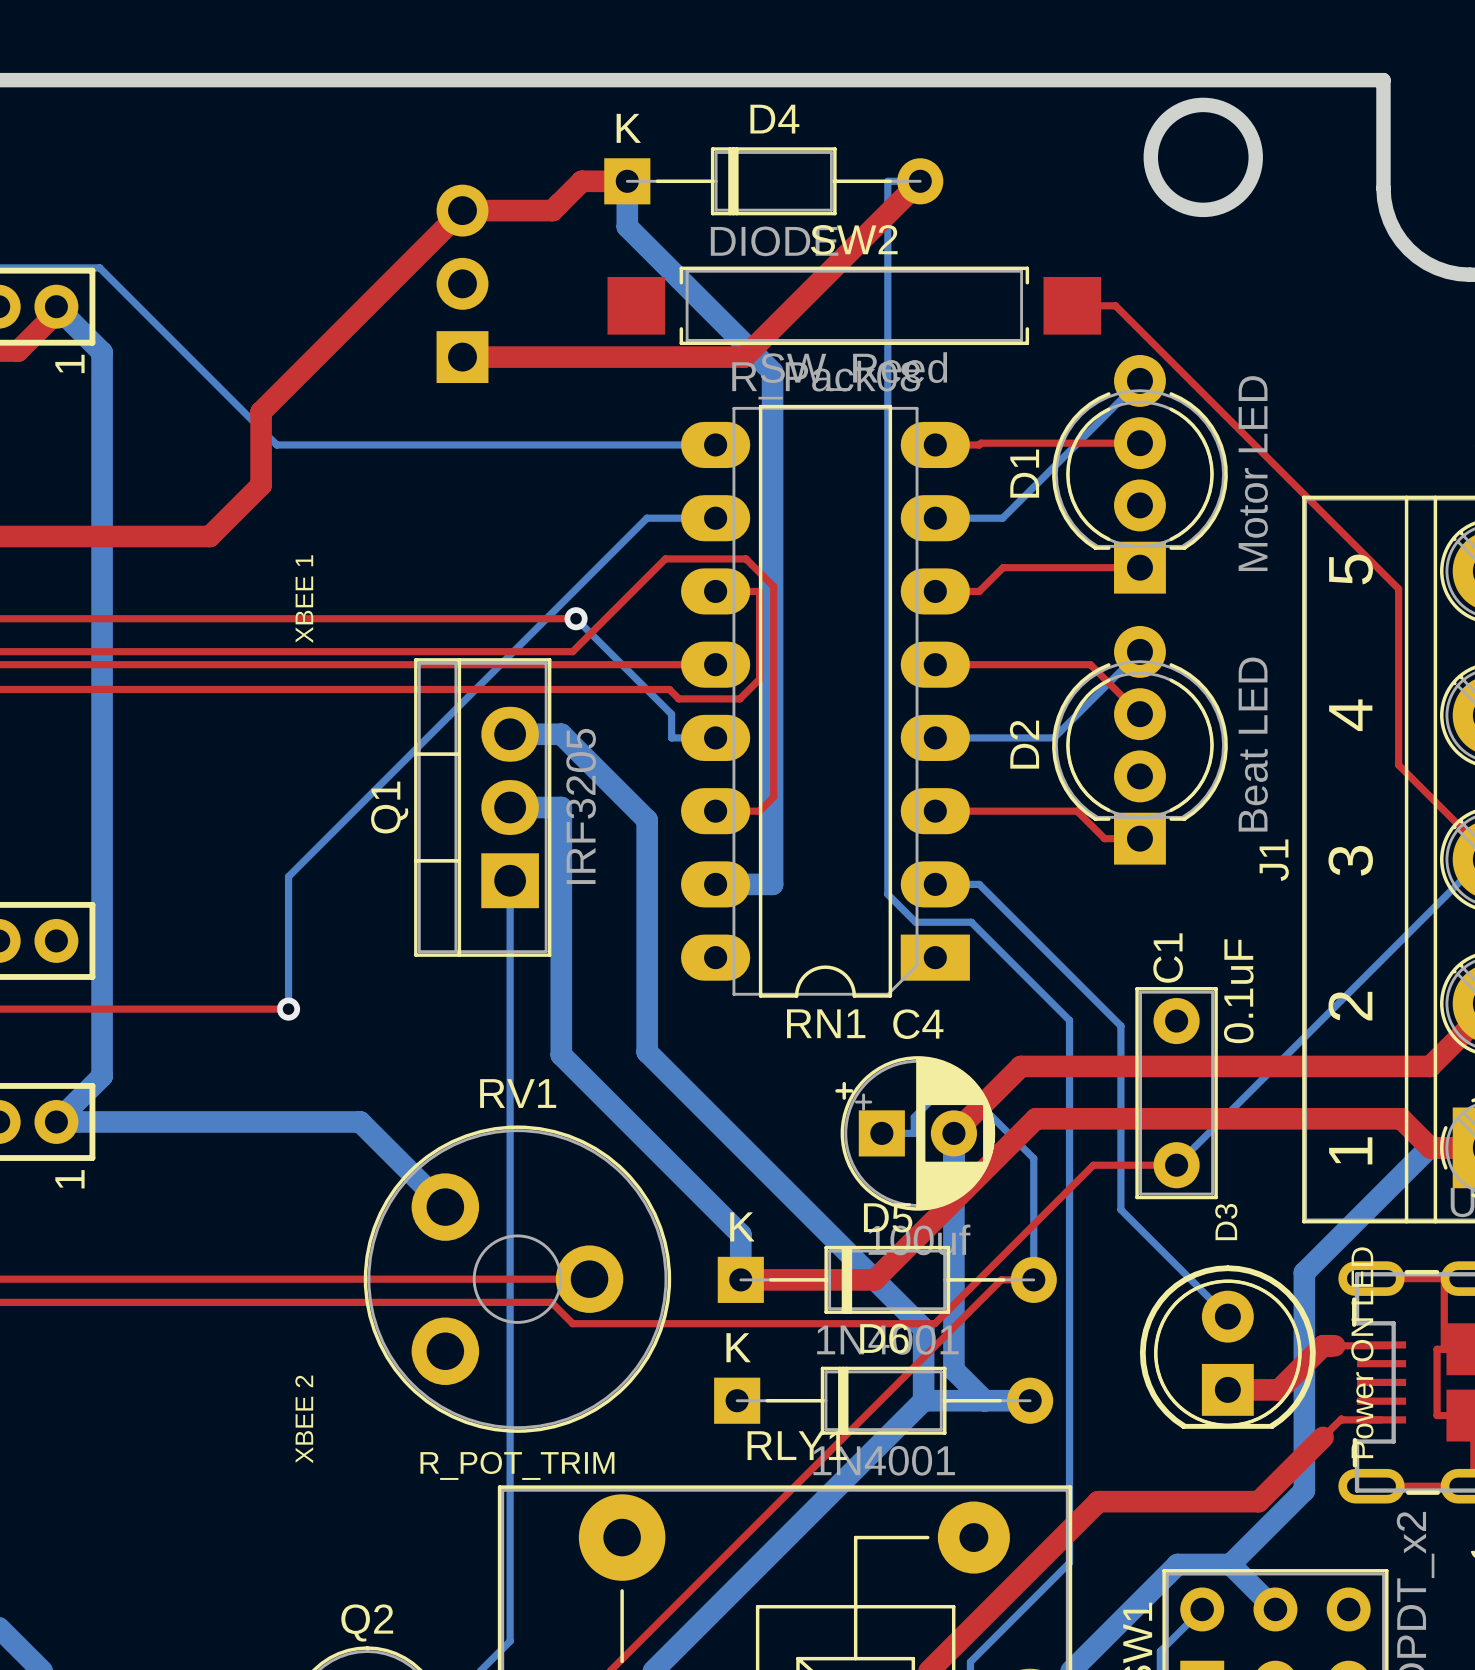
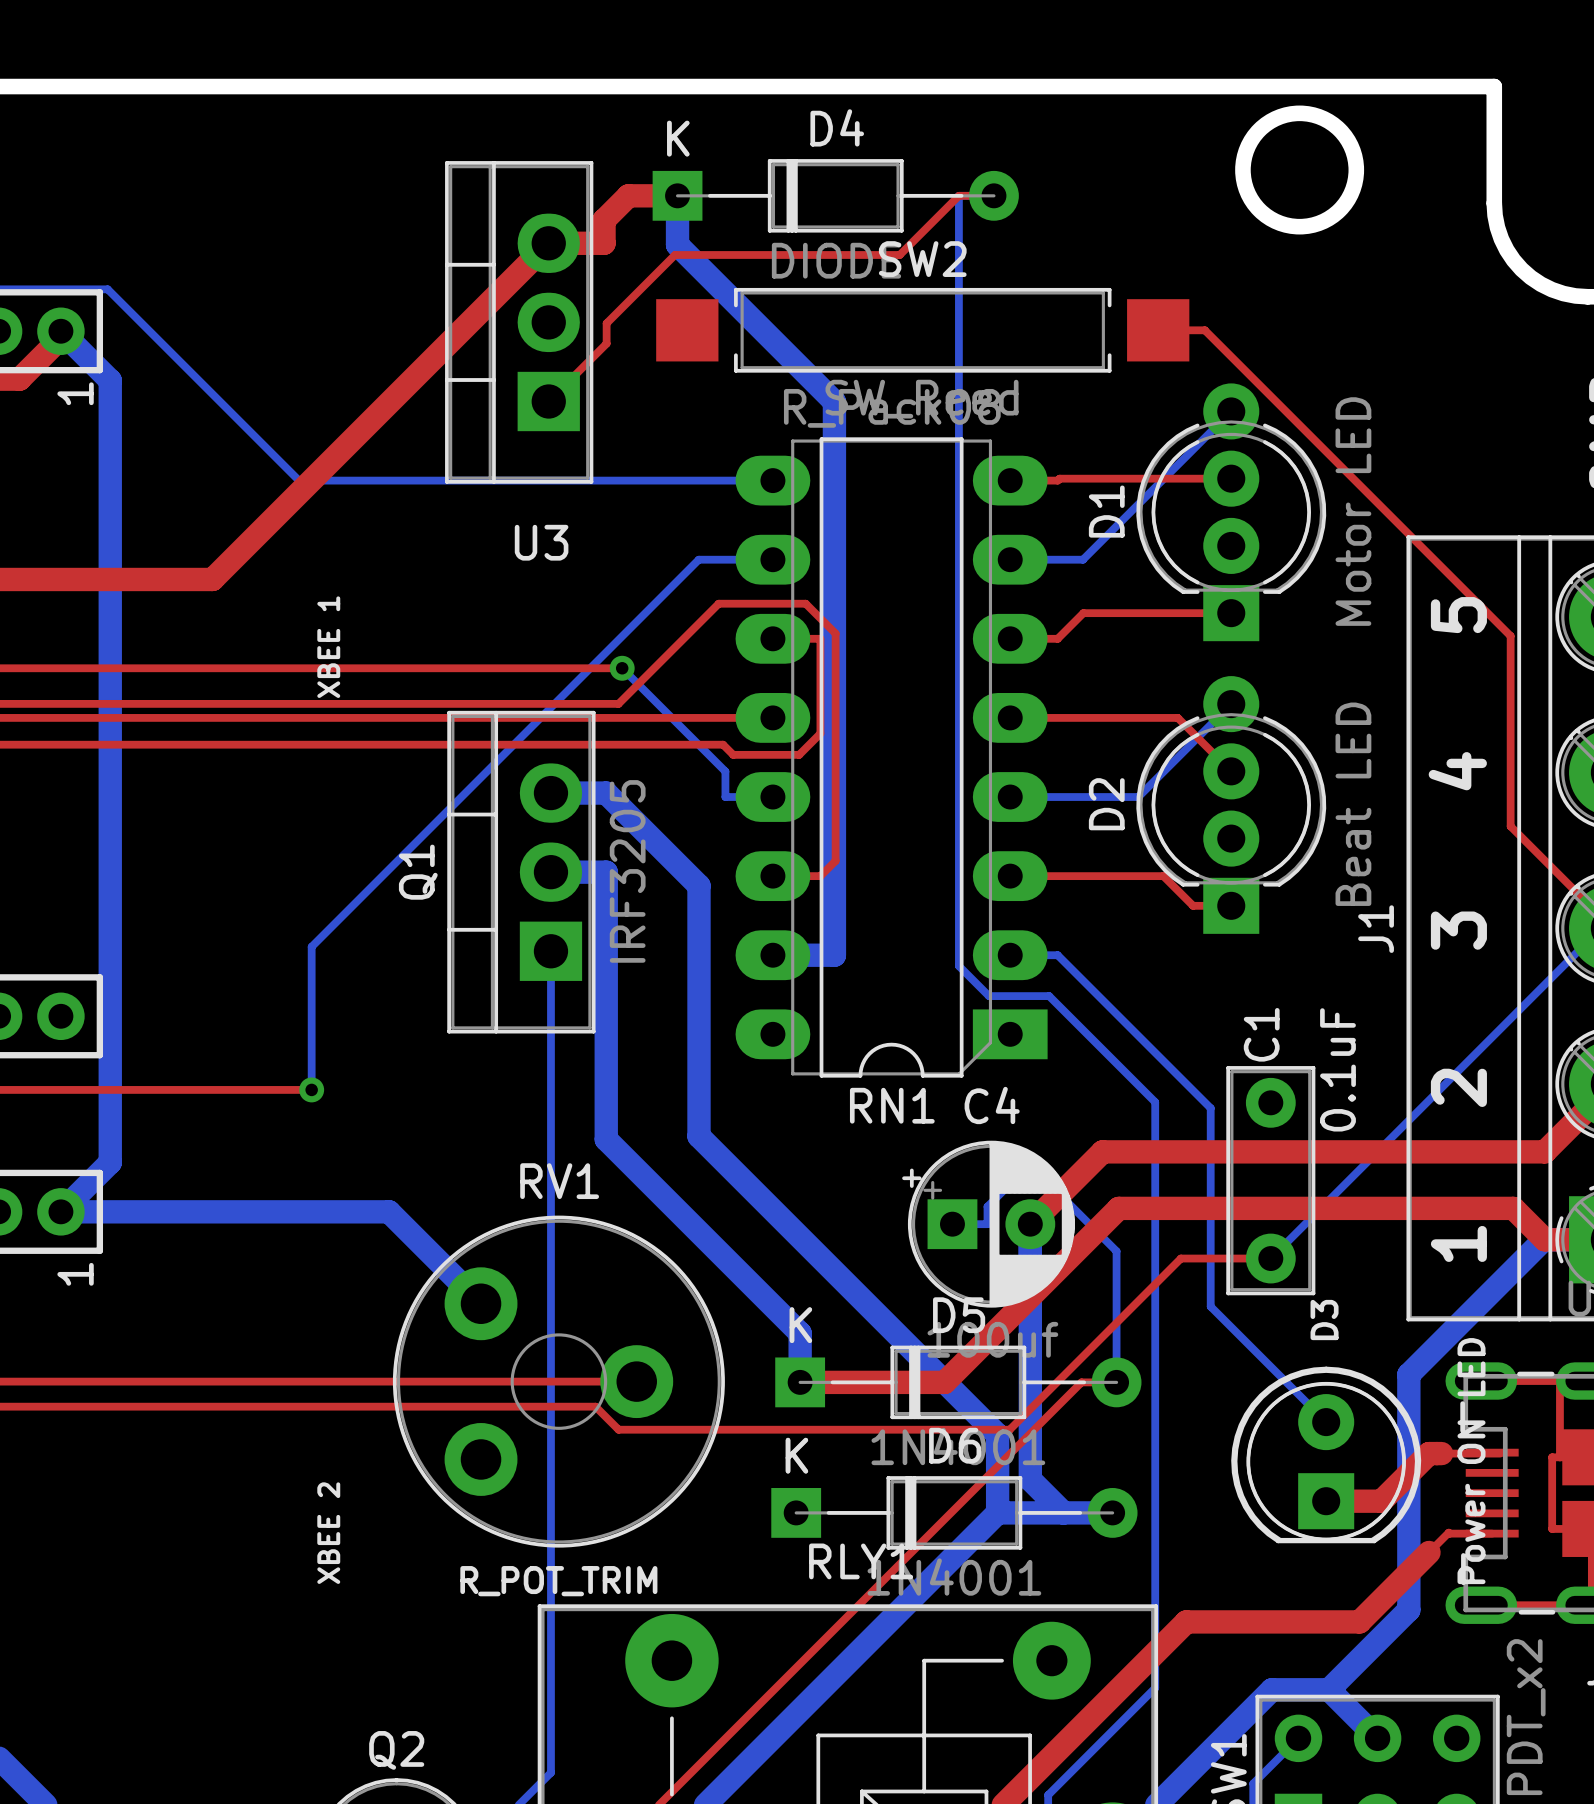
top track: (920, 181) (744, 357) (462, 357) -> (993, 195) (958, 195) (899, 254) (675, 254) (606, 323) (606, 343) (548, 401)
top track: (559, 203) (552, 210) (462, 210) (261, 412) (261, 485) (209, 536) (196, 536) -> (604, 220) (604, 243) (548, 243) (212, 579)
part: (462, 283) -> none
U3: none -> (519, 322)

